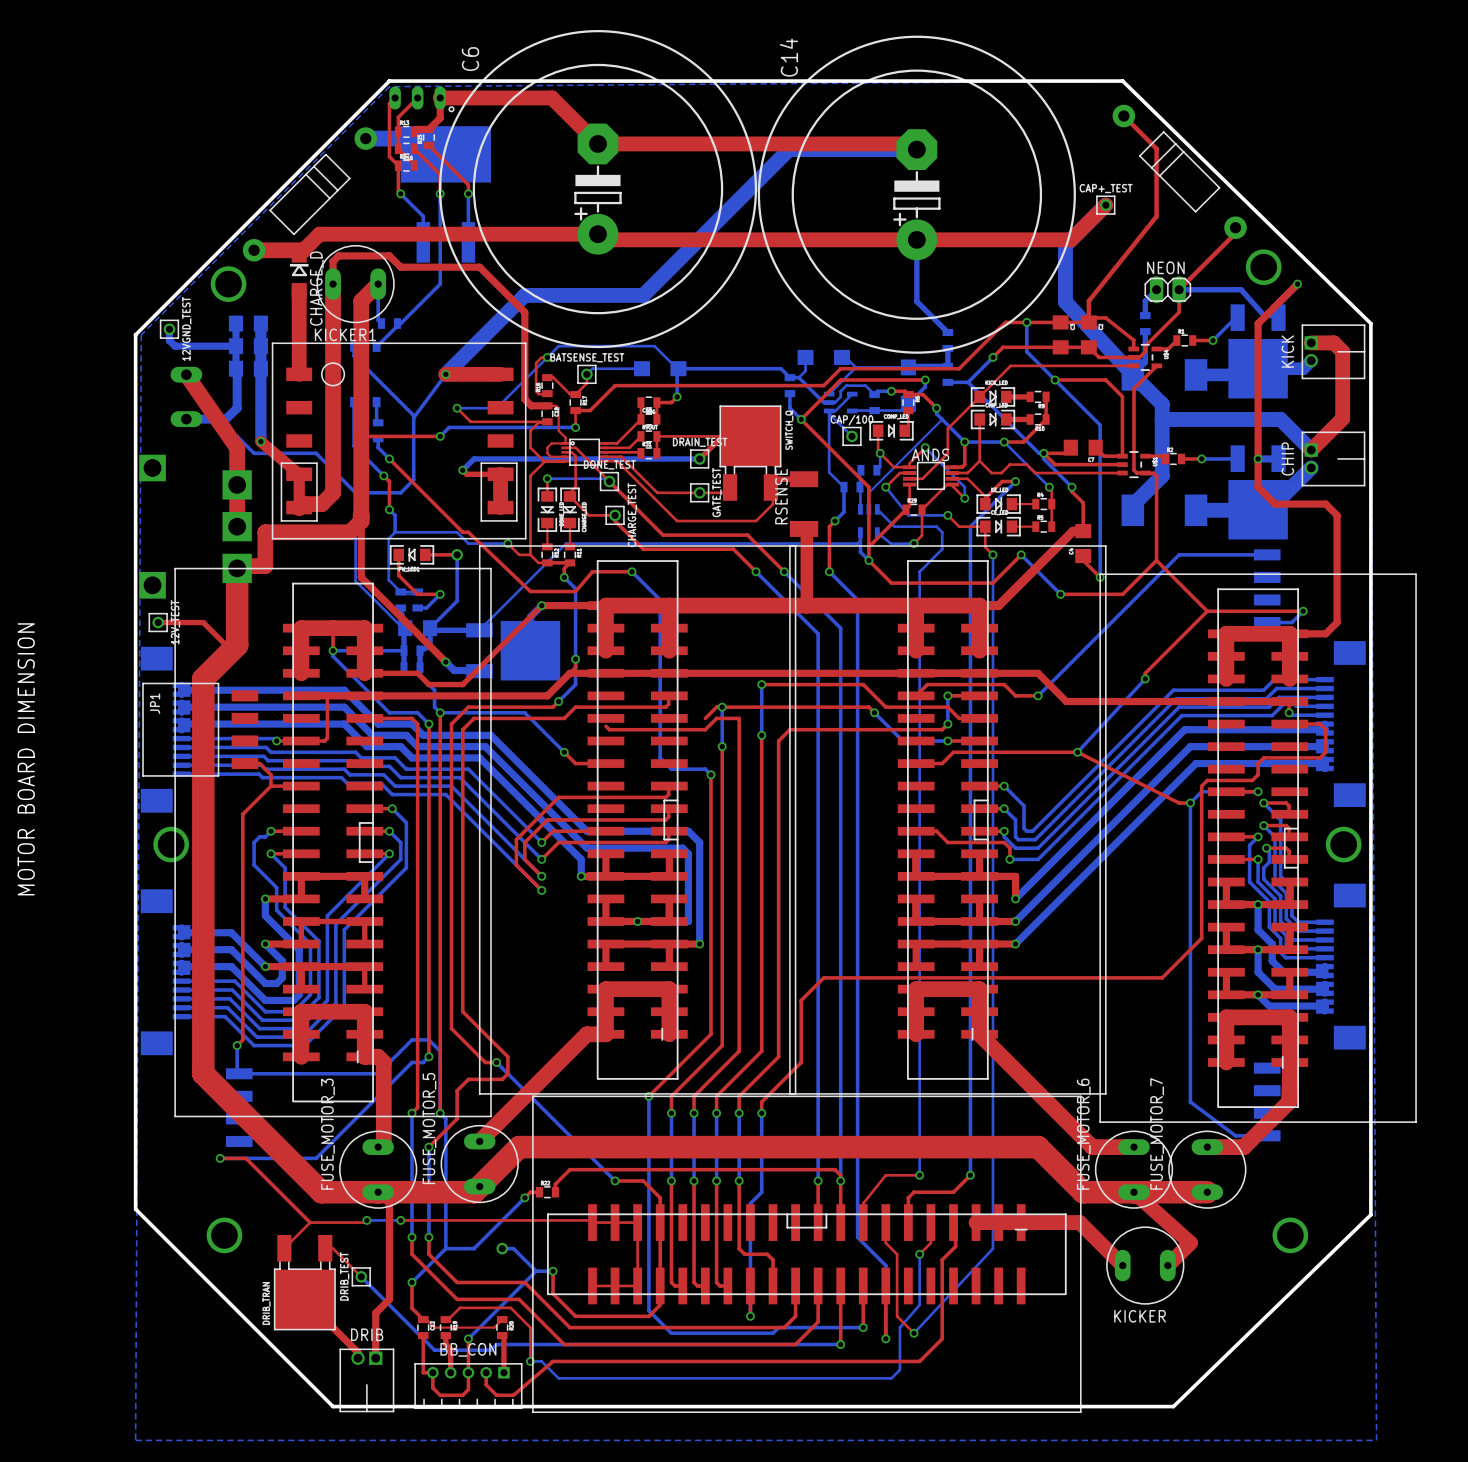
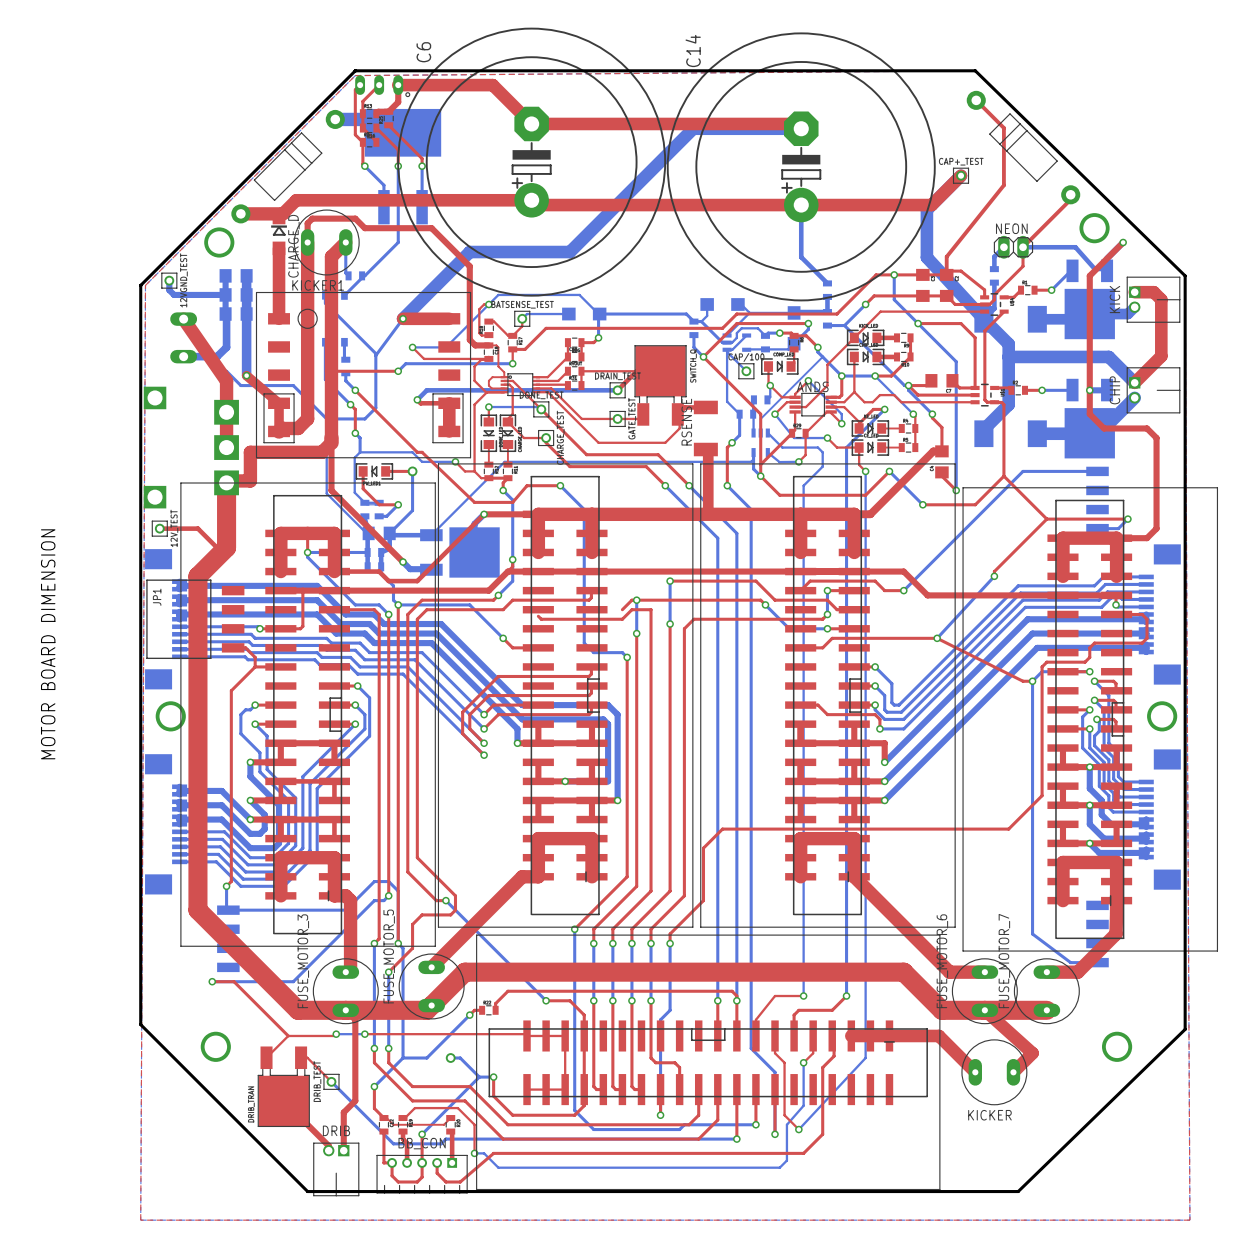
top zone outline: none -> (975, 70) (355, 75) (145, 285) (140, 1220) (1189, 1220) (1185, 275) (975, 70)
part footprint: [479, 545, 797, 1095] -> [437, 463, 694, 928]
part footprint: [789, 545, 1107, 1095] -> [700, 463, 956, 928]
part footprint: [174, 568, 492, 1118] -> [180, 482, 436, 947]
part footprint: [1099, 573, 1417, 1123] -> [962, 487, 1218, 952]
part footprint: [532, 1095, 1082, 1413] -> [476, 934, 941, 1190]

